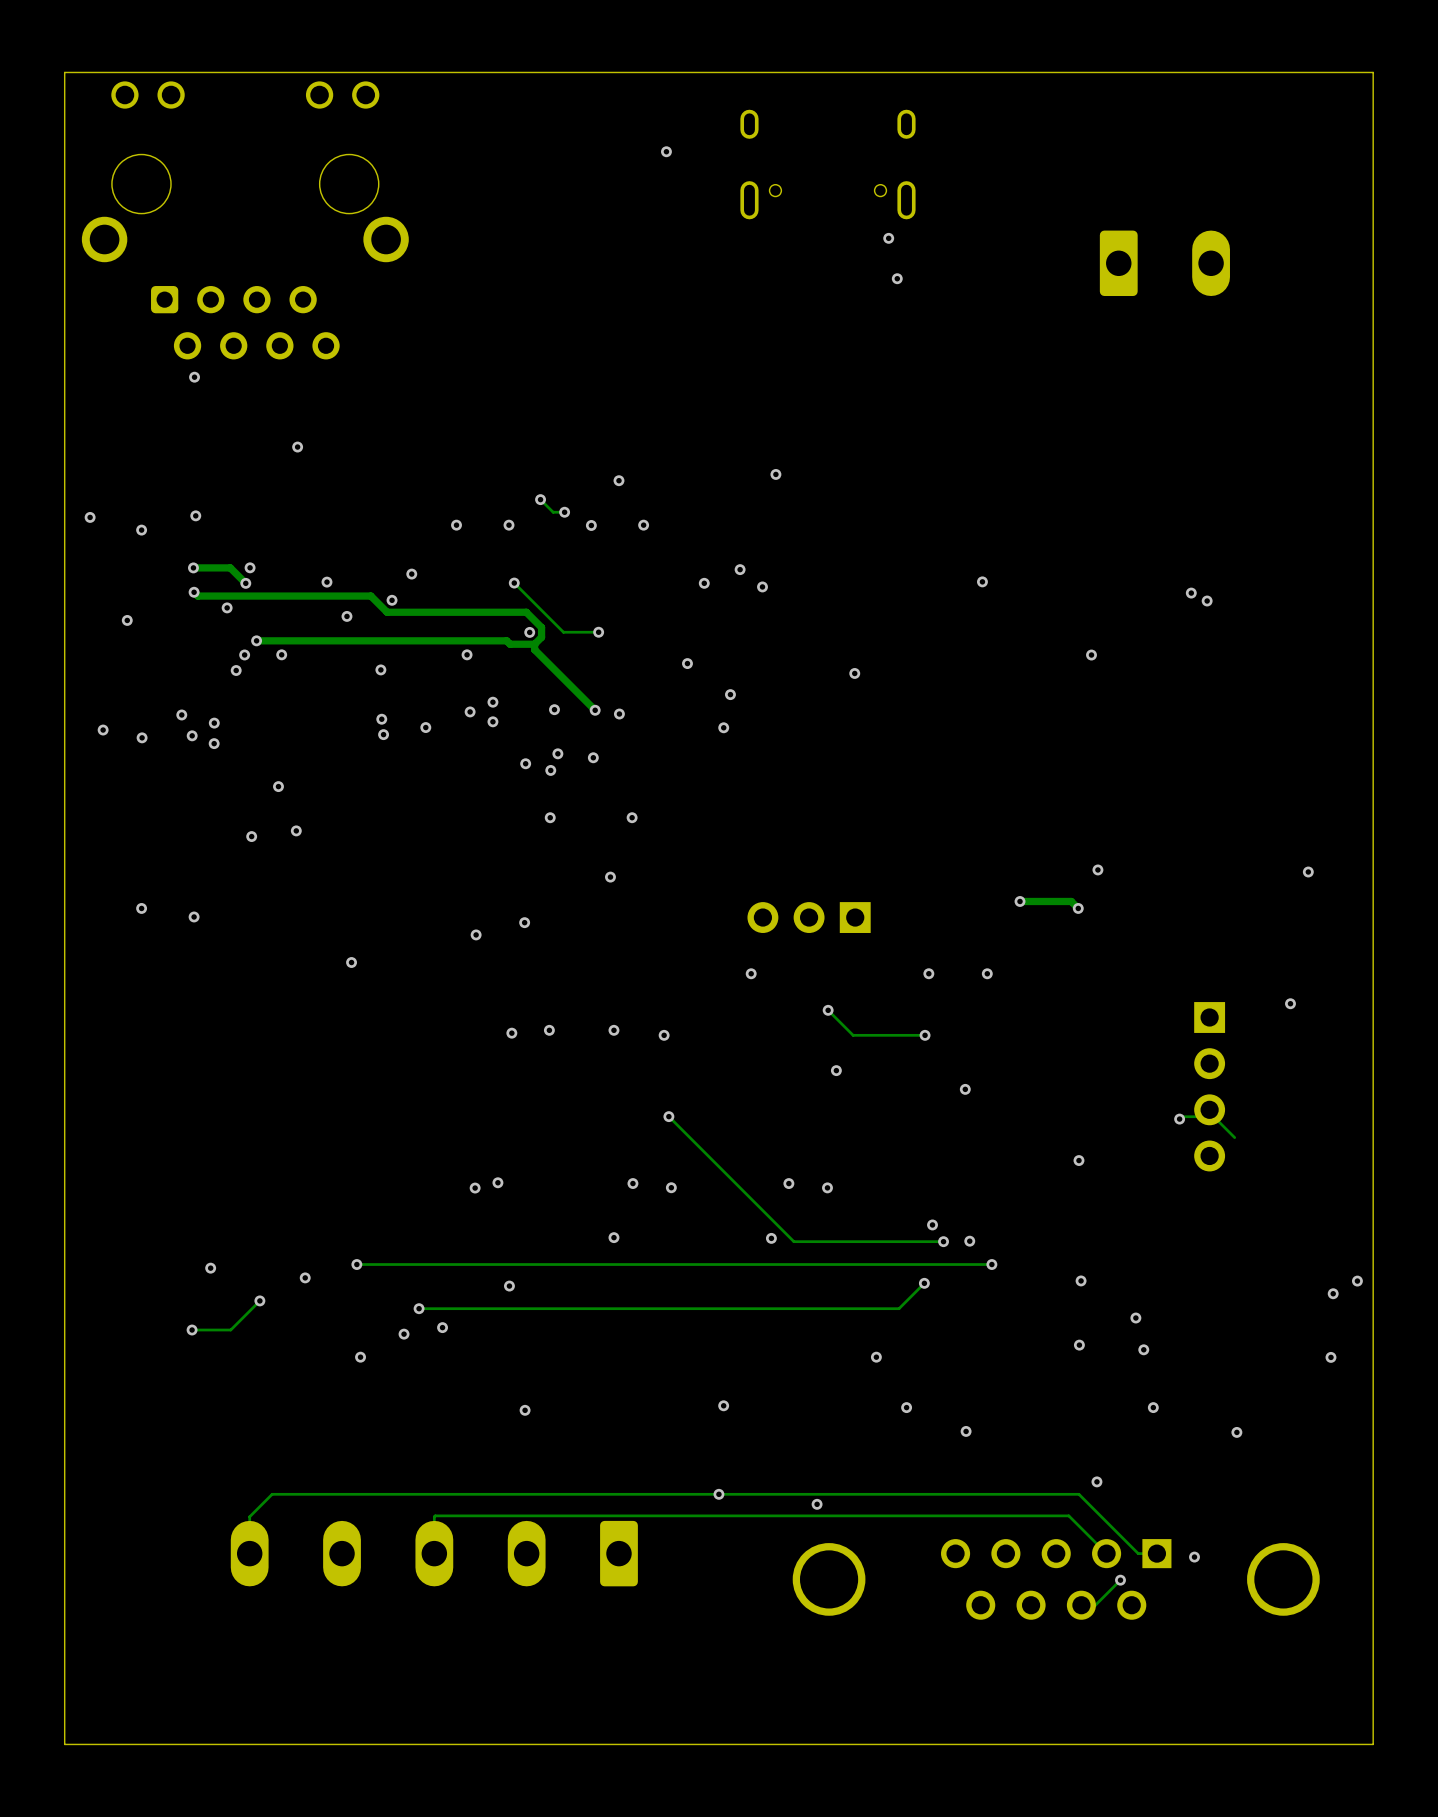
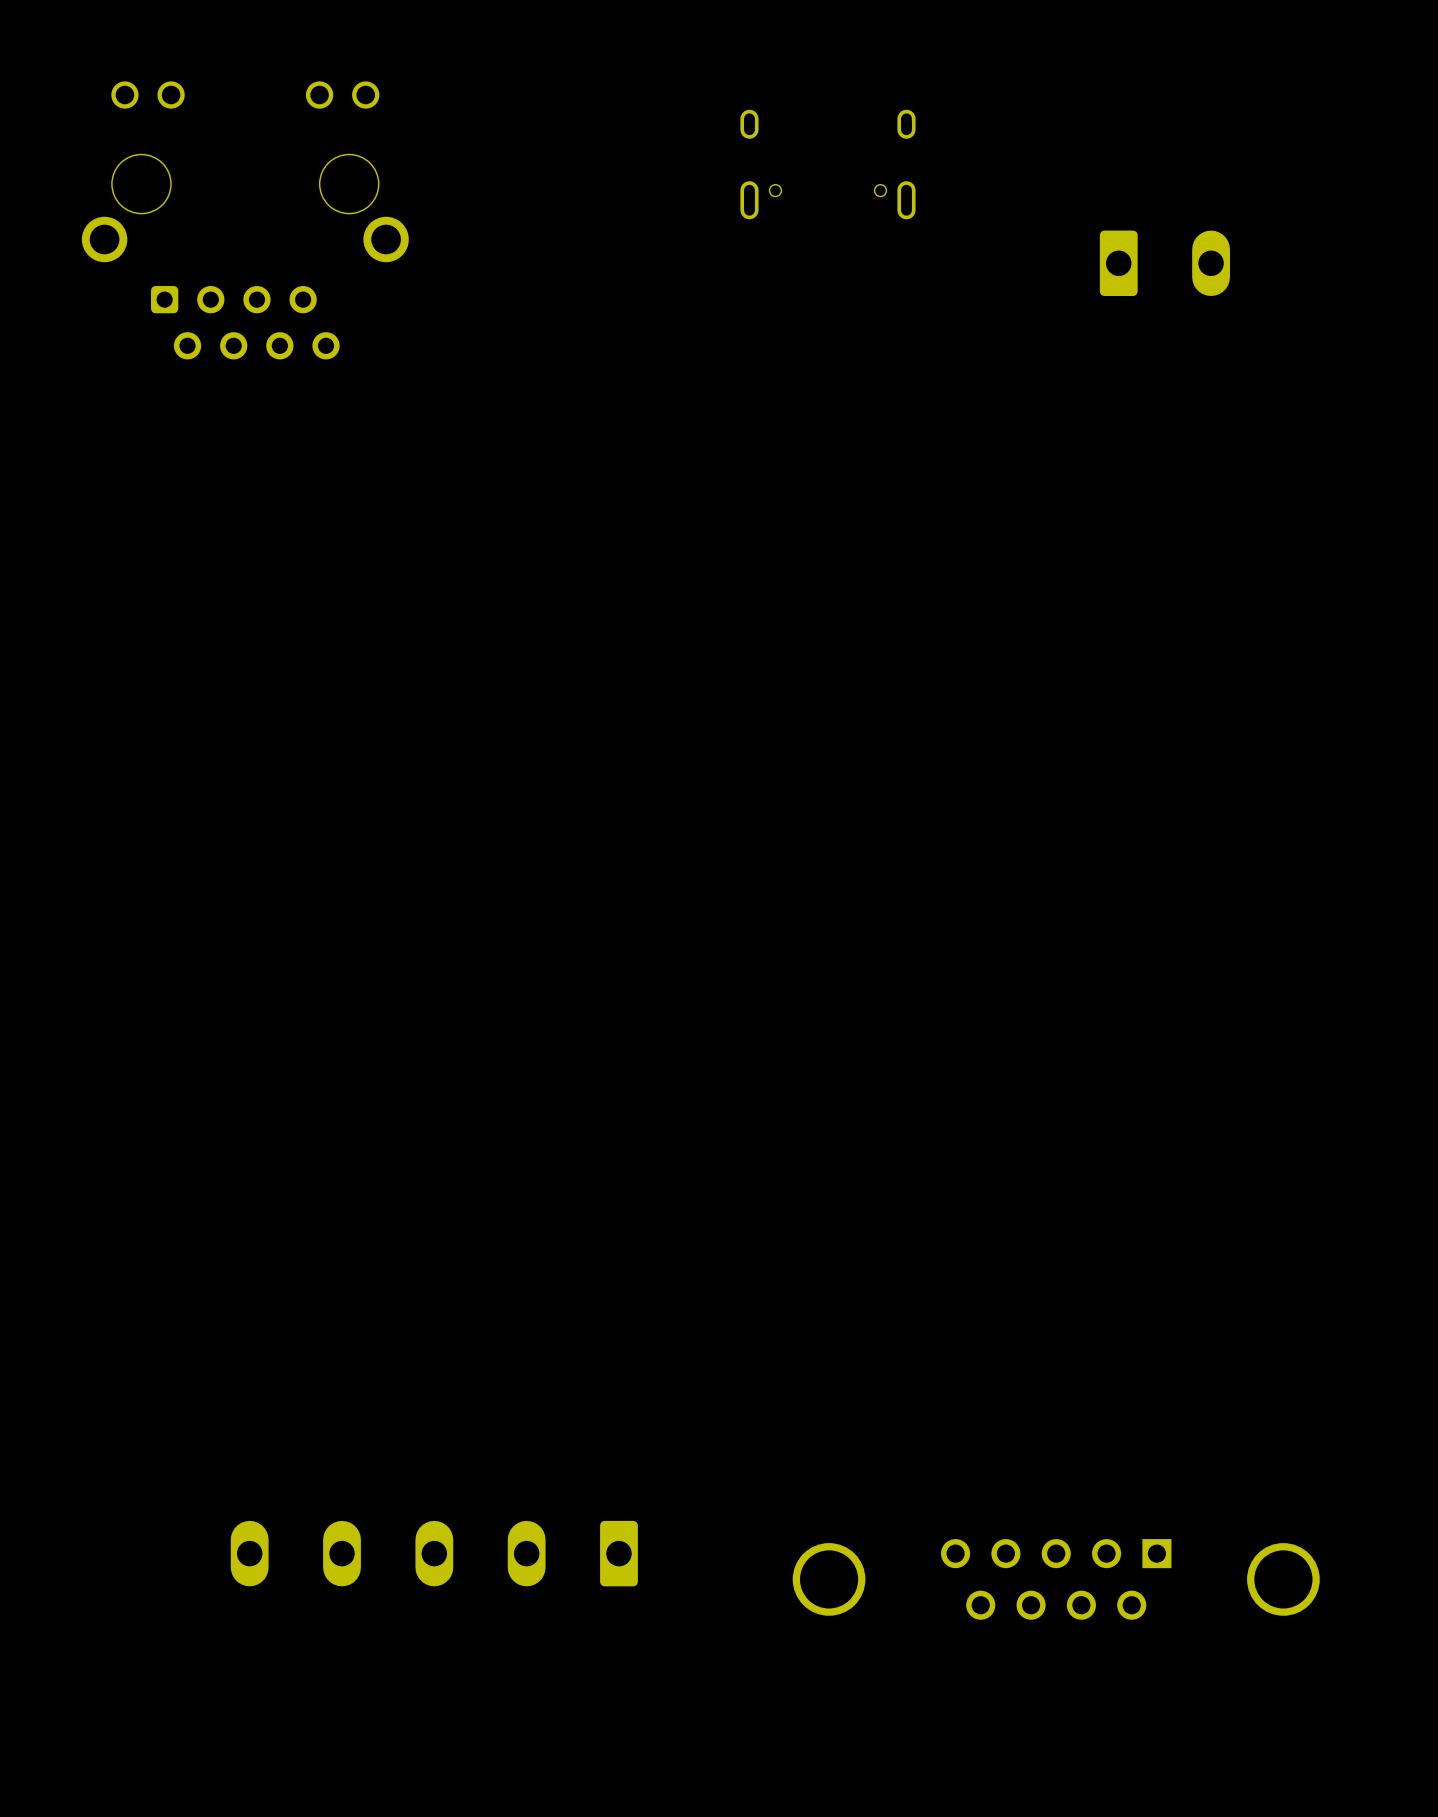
board edge: (1373, 72) (64, 72) (64, 1744) (1373, 1744) (1373, 72) -> none
via: (666, 151) -> none
via: (888, 238) -> none
via: (897, 278) -> none
via: (194, 377) -> none
via: (297, 447) -> none
via: (775, 474) -> none
via: (618, 480) -> none
track: (540, 499) (553, 512) (564, 512) -> none
via: (540, 499) -> none
via: (564, 512) -> none
via: (195, 515) -> none
via: (90, 517) -> none
via: (456, 525) -> none
via: (509, 525) -> none
via: (591, 525) -> none
via: (643, 525) -> none
via: (141, 530) -> none
track: (193, 567) (230, 567) (245, 583) -> none
via: (193, 567) -> none
via: (250, 567) -> none
via: (740, 569) -> none
via: (411, 574) -> none
via: (982, 581) -> none
via: (326, 582) -> none
via: (245, 583) -> none
track: (514, 583) (563, 632) (598, 632) -> none
via: (514, 583) -> none
via: (704, 583) -> none
via: (762, 586) -> none
track: (194, 592) (197, 596) (370, 596) (387, 612) (526, 612) (541, 627) (541, 637) (534, 644) -> none
via: (194, 592) -> none
via: (1191, 593) -> none
via: (392, 600) -> none
via: (1207, 600) -> none
via: (227, 607) -> none
via: (346, 616) -> none
via: (127, 620) -> none
via: (529, 632) -> none
via: (598, 632) -> none
track: (256, 640) (506, 640) (510, 644) (534, 644) -> none
via: (256, 640) -> none
track: (534, 644) (534, 649) (595, 710) -> none
via: (244, 654) -> none
via: (281, 654) -> none
via: (467, 654) -> none
via: (1091, 655) -> none
via: (687, 663) -> none
via: (380, 669) -> none
via: (236, 670) -> none
via: (854, 673) -> none
via: (730, 694) -> none
via: (492, 702) -> none
via: (554, 709) -> none
via: (595, 710) -> none
via: (470, 711) -> none
via: (181, 714) -> none
via: (619, 714) -> none
via: (381, 719) -> none
via: (492, 721) -> none
via: (214, 723) -> none
via: (425, 727) -> none
via: (723, 727) -> none
via: (103, 730) -> none
via: (383, 734) -> none
via: (192, 735) -> none
via: (142, 737) -> none
via: (214, 743) -> none
via: (557, 753) -> none
via: (593, 757) -> none
via: (525, 763) -> none
via: (550, 770) -> none
via: (278, 786) -> none
via: (550, 817) -> none
via: (632, 817) -> none
via: (296, 830) -> none
via: (251, 836) -> none
via: (1097, 869) -> none
via: (1308, 872) -> none
via: (610, 877) -> none
track: (1020, 901) (1071, 901) (1078, 908) -> none
via: (1020, 901) -> none
via: (141, 908) -> none
via: (1078, 908) -> none
via: (194, 916) -> none
part: (809, 917) -> none
via: (524, 922) -> none
via: (476, 934) -> none
via: (351, 962) -> none
via: (751, 973) -> none
via: (928, 973) -> none
via: (987, 973) -> none
via: (1290, 1003) -> none
track: (828, 1010) (853, 1035) (925, 1035) -> none
via: (828, 1010) -> none
via: (549, 1030) -> none
via: (613, 1030) -> none
via: (511, 1033) -> none
via: (664, 1035) -> none
via: (925, 1035) -> none
via: (836, 1070) -> none
part: (1209, 1086) -> none
via: (965, 1089) -> none
track: (668, 1116) (793, 1241) (943, 1241) -> none
via: (668, 1116) -> none
track: (1179, 1119) (1181, 1116) (1213, 1116) (1234, 1137) -> none
via: (1179, 1119) -> none
via: (1078, 1160) -> none
via: (497, 1182) -> none
via: (632, 1183) -> none
via: (788, 1183) -> none
via: (671, 1187) -> none
via: (827, 1187) -> none
via: (475, 1188) -> none
via: (932, 1224) -> none
via: (613, 1237) -> none
via: (771, 1238) -> none
via: (943, 1241) -> none
via: (969, 1241) -> none
via: (356, 1264) -> none
track: (991, 1264) (356, 1264) -> none
via: (991, 1264) -> none
via: (210, 1268) -> none
via: (305, 1277) -> none
via: (1081, 1280) -> none
via: (1357, 1281) -> none
track: (924, 1283) (899, 1308) (419, 1308) -> none
via: (924, 1283) -> none
via: (509, 1286) -> none
via: (1333, 1293) -> none
track: (259, 1300) (230, 1330) (192, 1330) -> none
via: (259, 1300) -> none
via: (419, 1308) -> none
via: (1135, 1318) -> none
via: (442, 1327) -> none
via: (192, 1330) -> none
via: (404, 1334) -> none
via: (1079, 1345) -> none
via: (1143, 1349) -> none
via: (360, 1357) -> none
via: (876, 1357) -> none
via: (1330, 1357) -> none
via: (723, 1405) -> none
via: (906, 1407) -> none
via: (1153, 1407) -> none
via: (525, 1410) -> none
via: (966, 1431) -> none
via: (1236, 1432) -> none
via: (1096, 1481) -> none
via: (718, 1494) -> none
via: (817, 1504) -> none
track: (1106, 1553) (1068, 1515) (435, 1515) (434, 1553) -> none
track: (1156, 1553) (1138, 1553) (1078, 1494) (272, 1494) (249, 1516) (249, 1553) -> none
via: (1194, 1557) -> none
track: (1120, 1580) (1095, 1605) (1081, 1605) -> none
via: (1120, 1580) -> none

